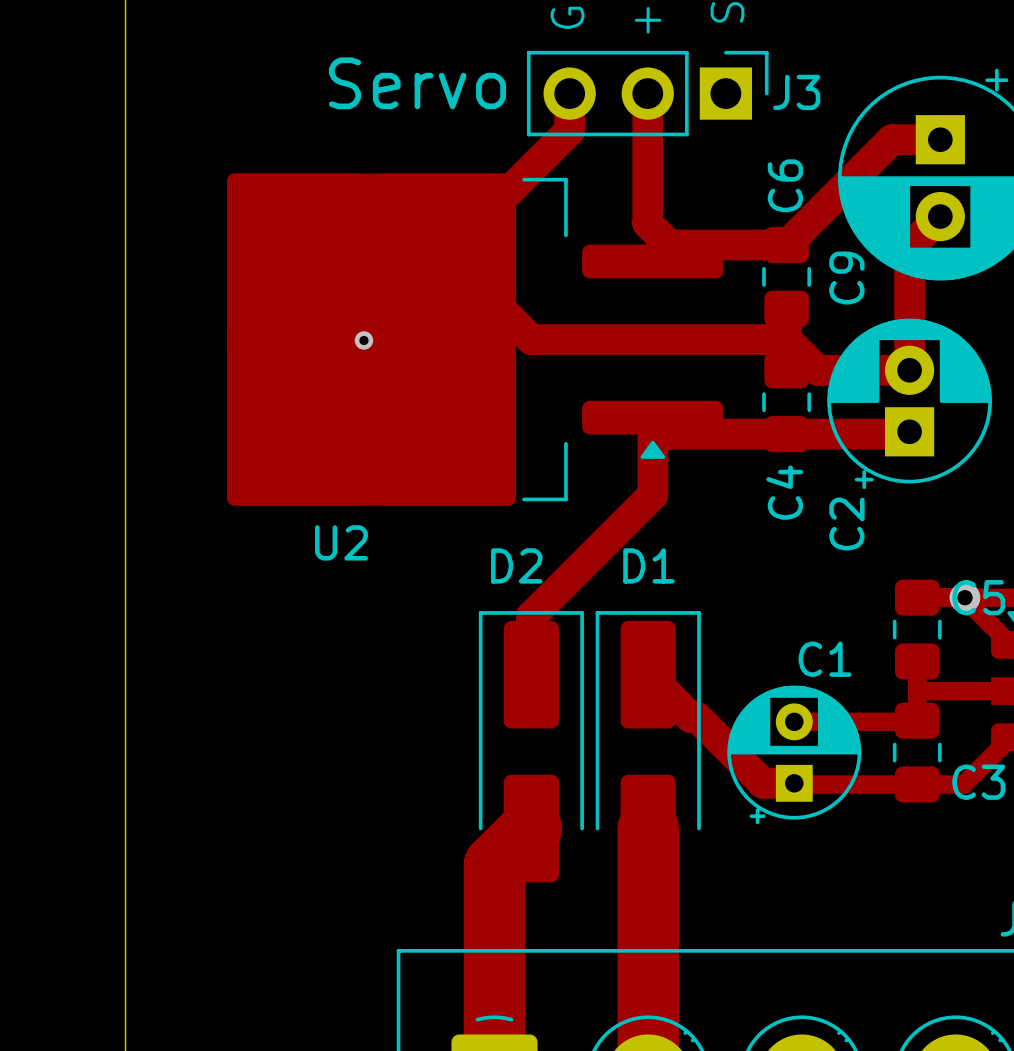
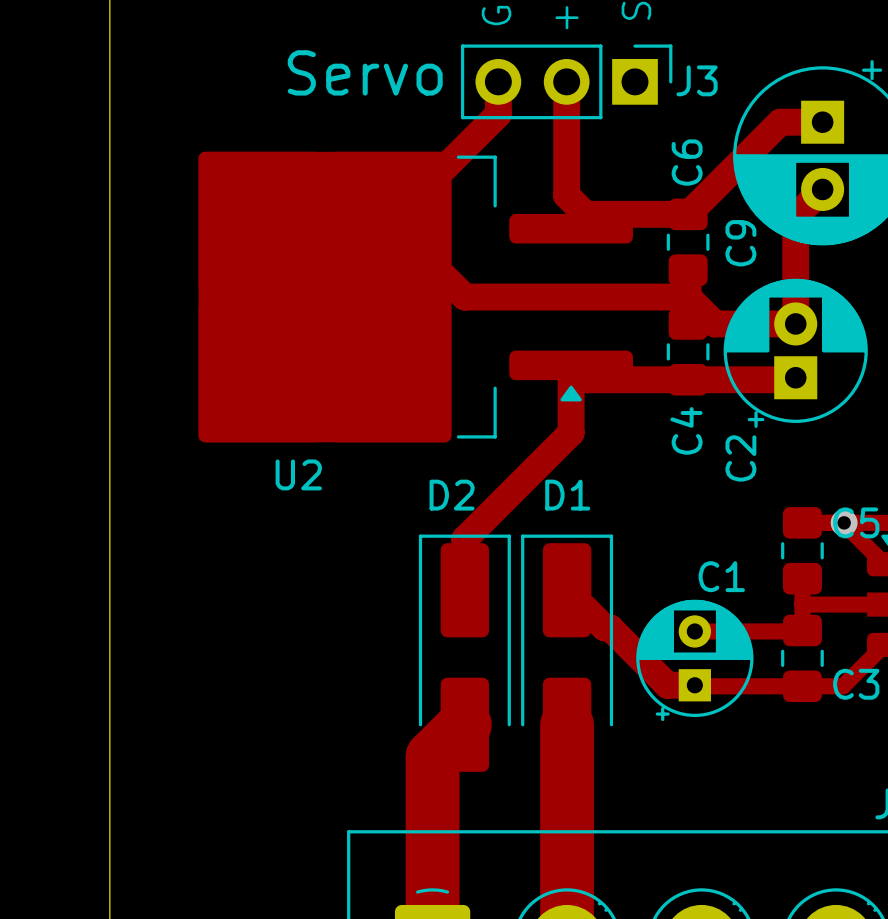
via: (363, 340) -> none

